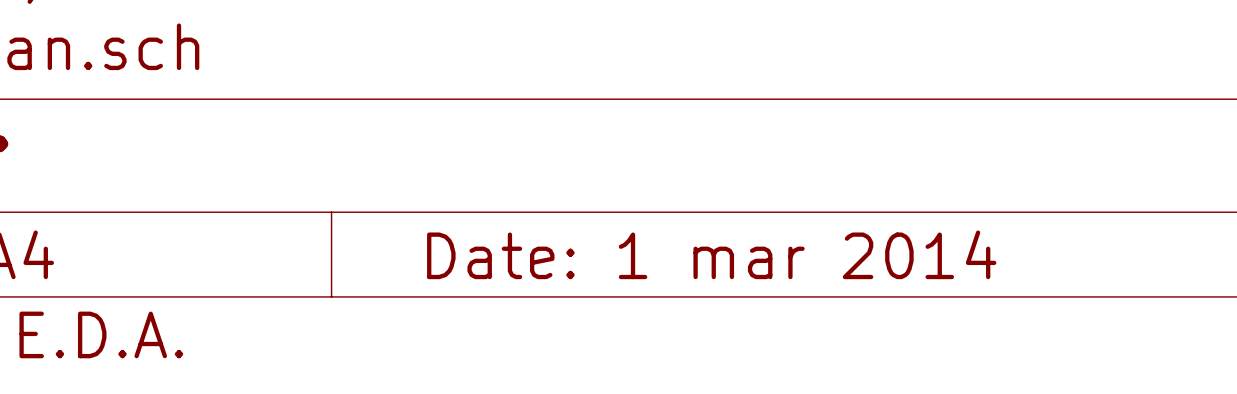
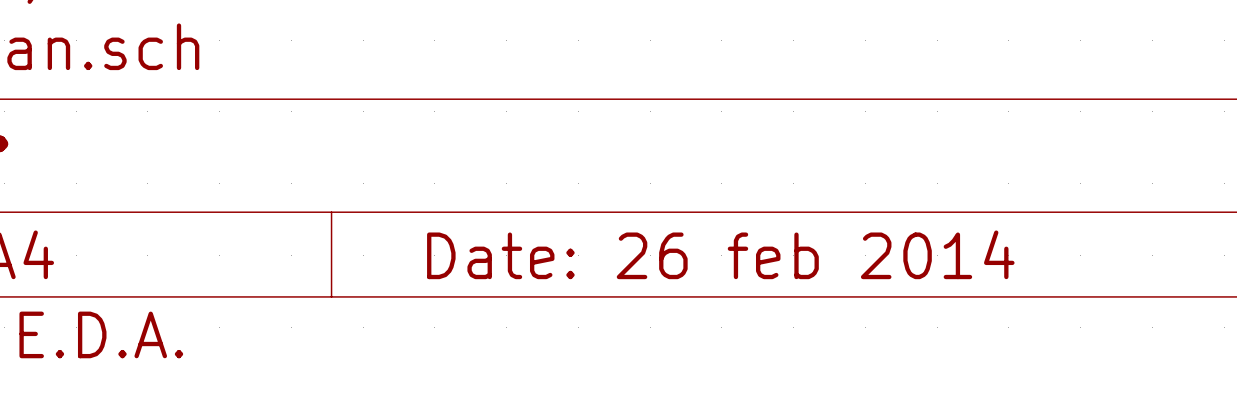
title block: Date: 1 mar 2014 (711, 254) -> Date: 26 feb 2014 (720, 254)

